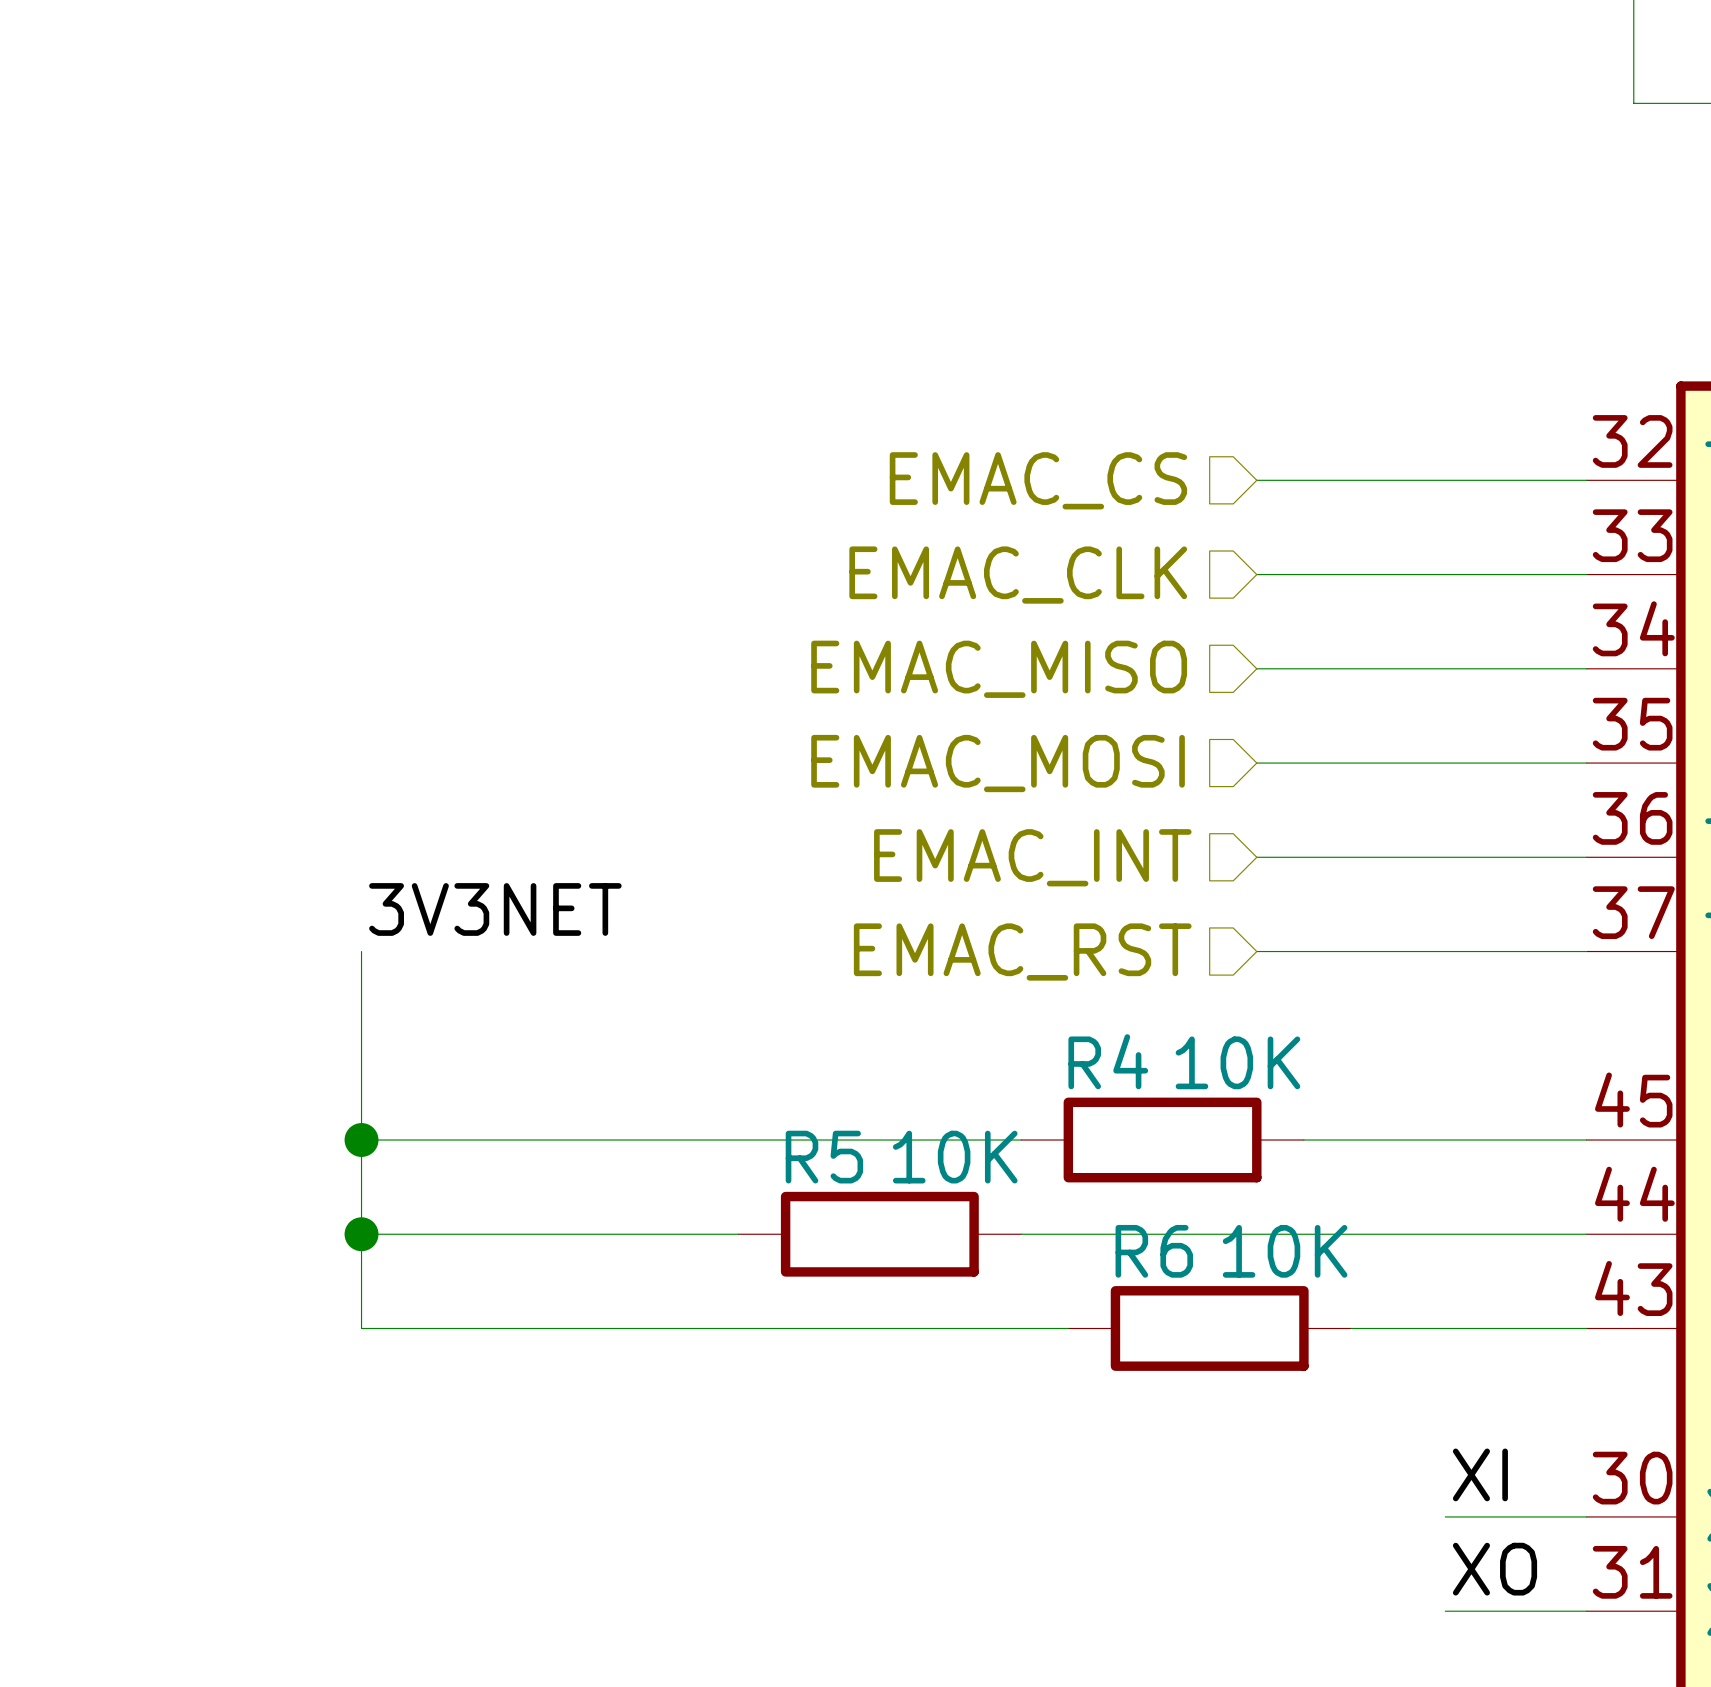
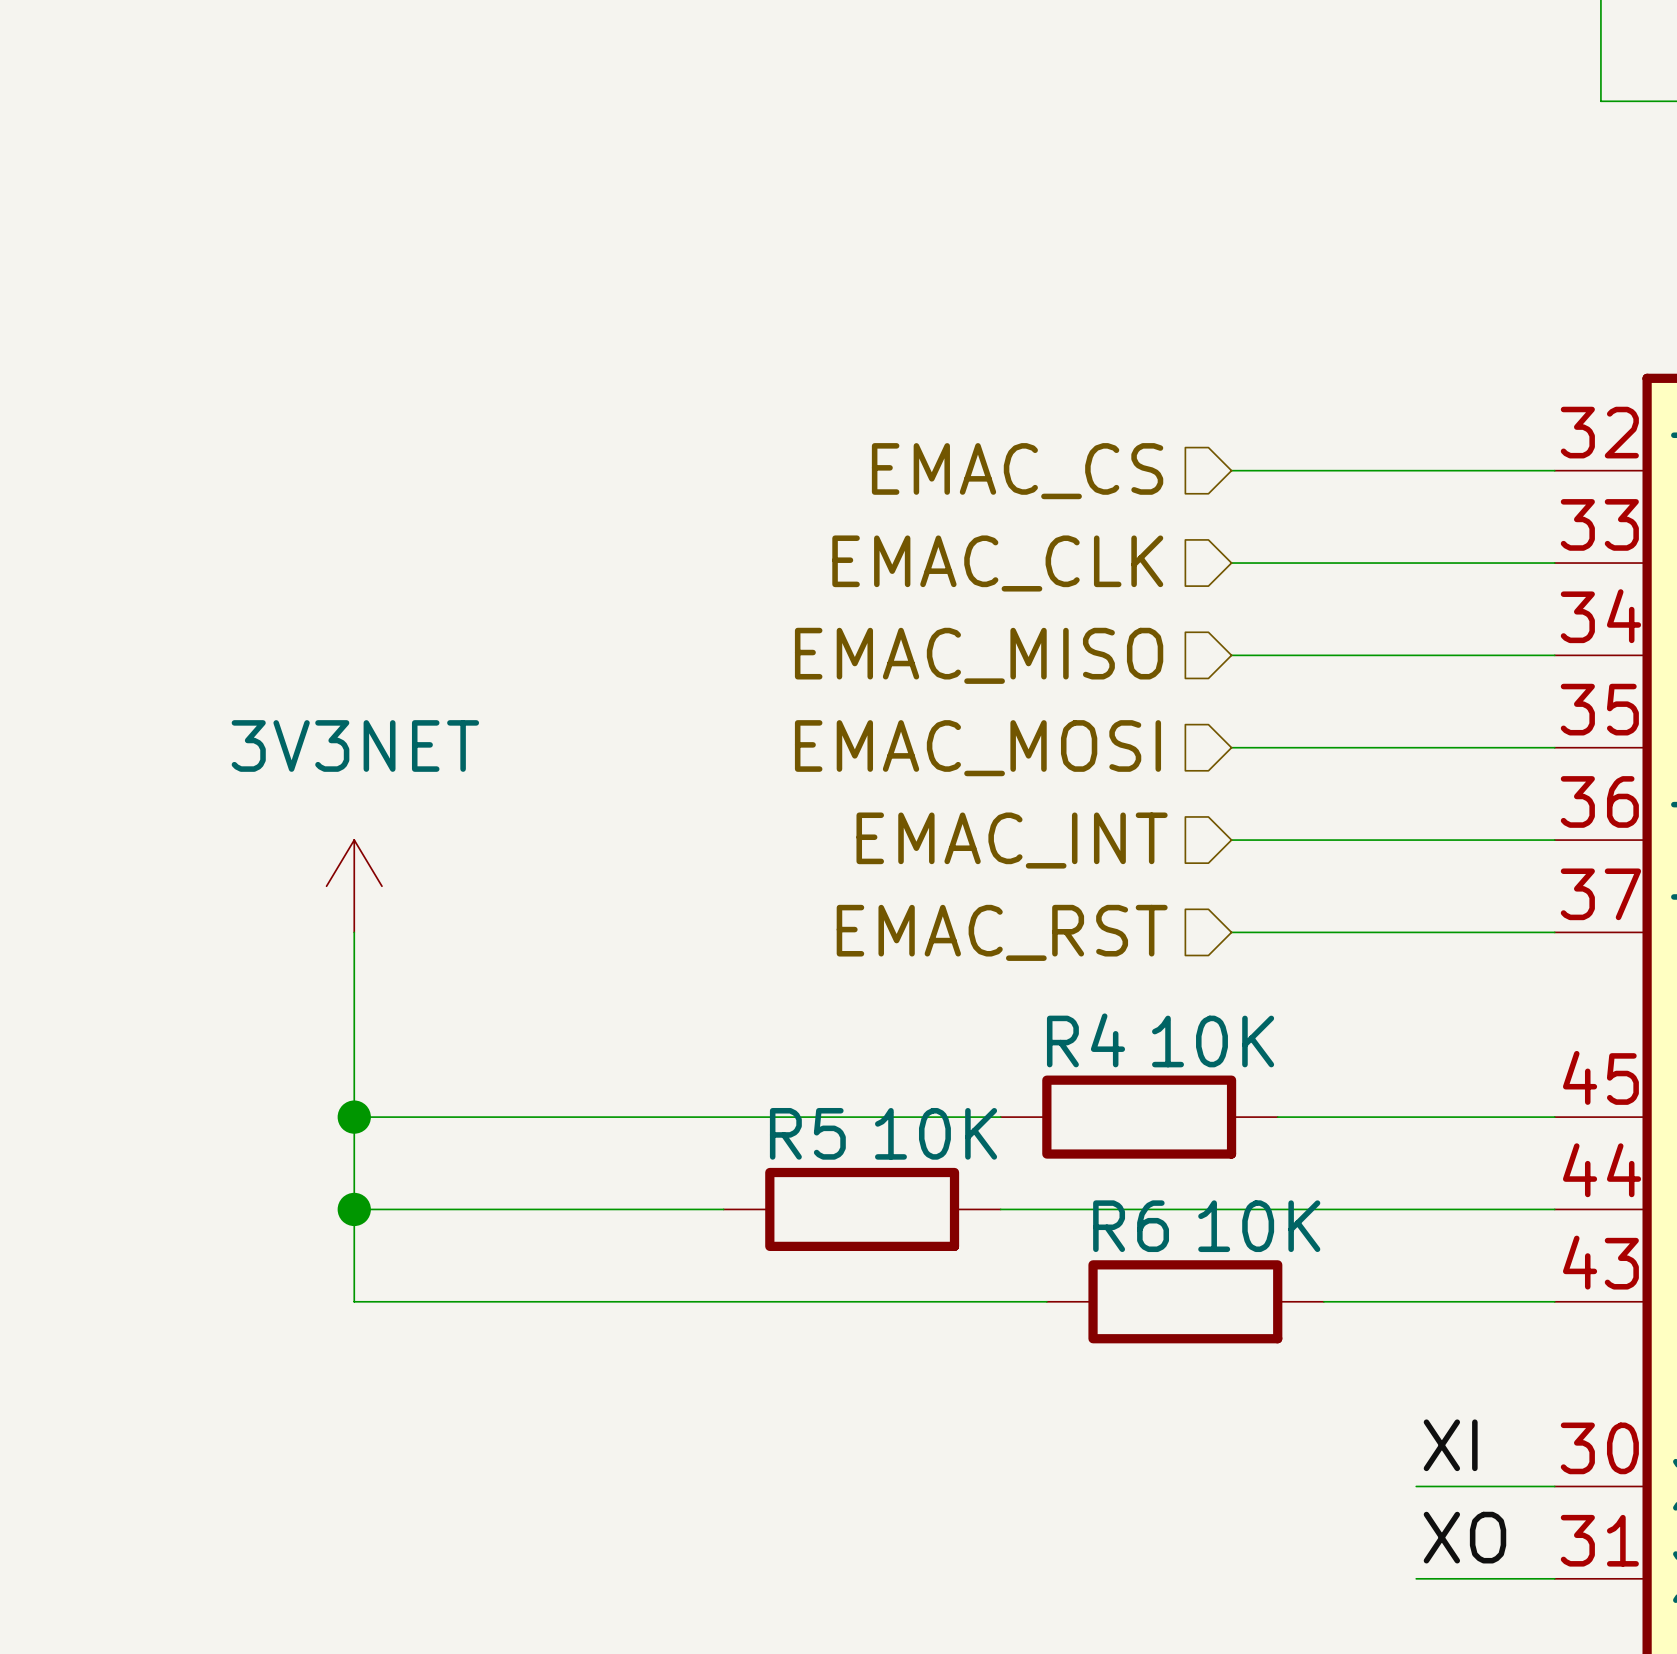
power symbol: none -> 3V3NET (354, 886)
label: 3V3NET (495, 909) -> none

